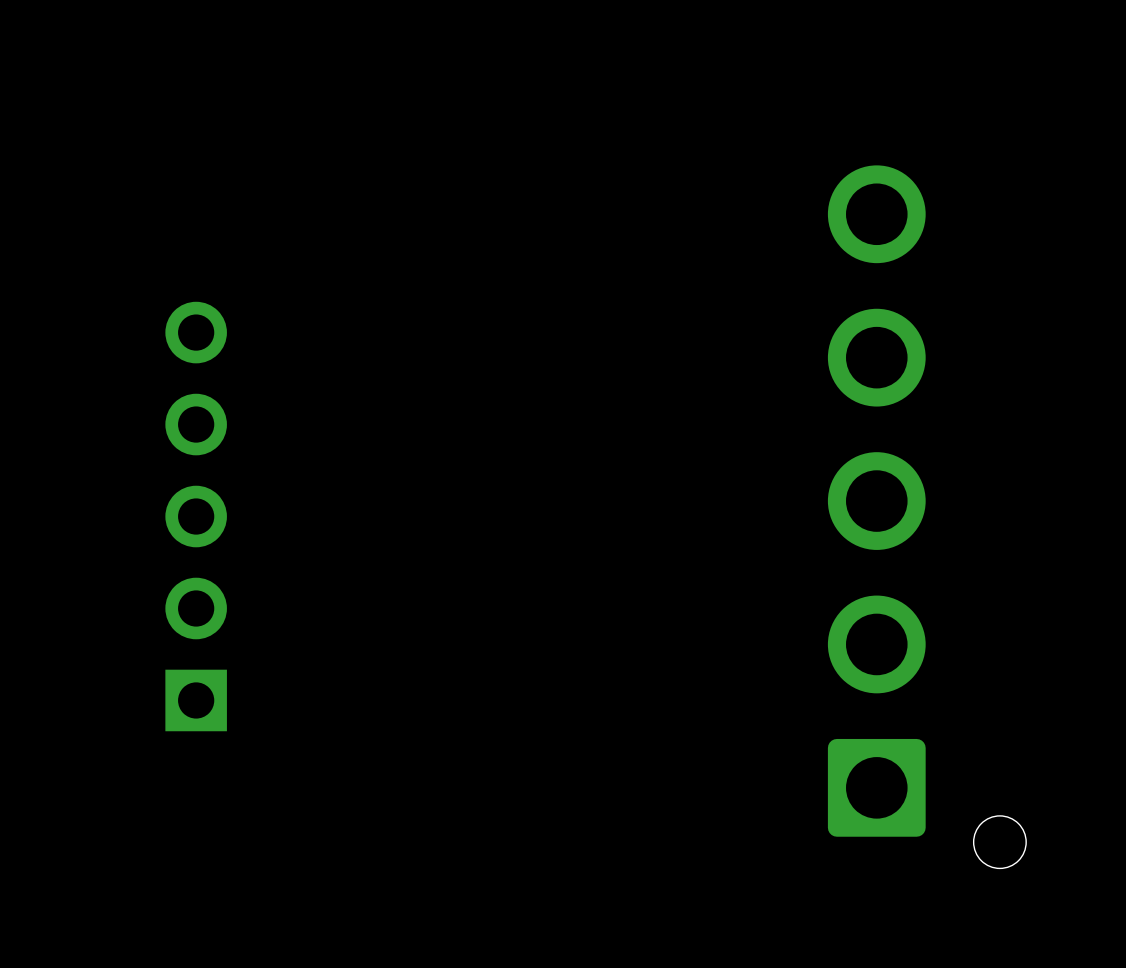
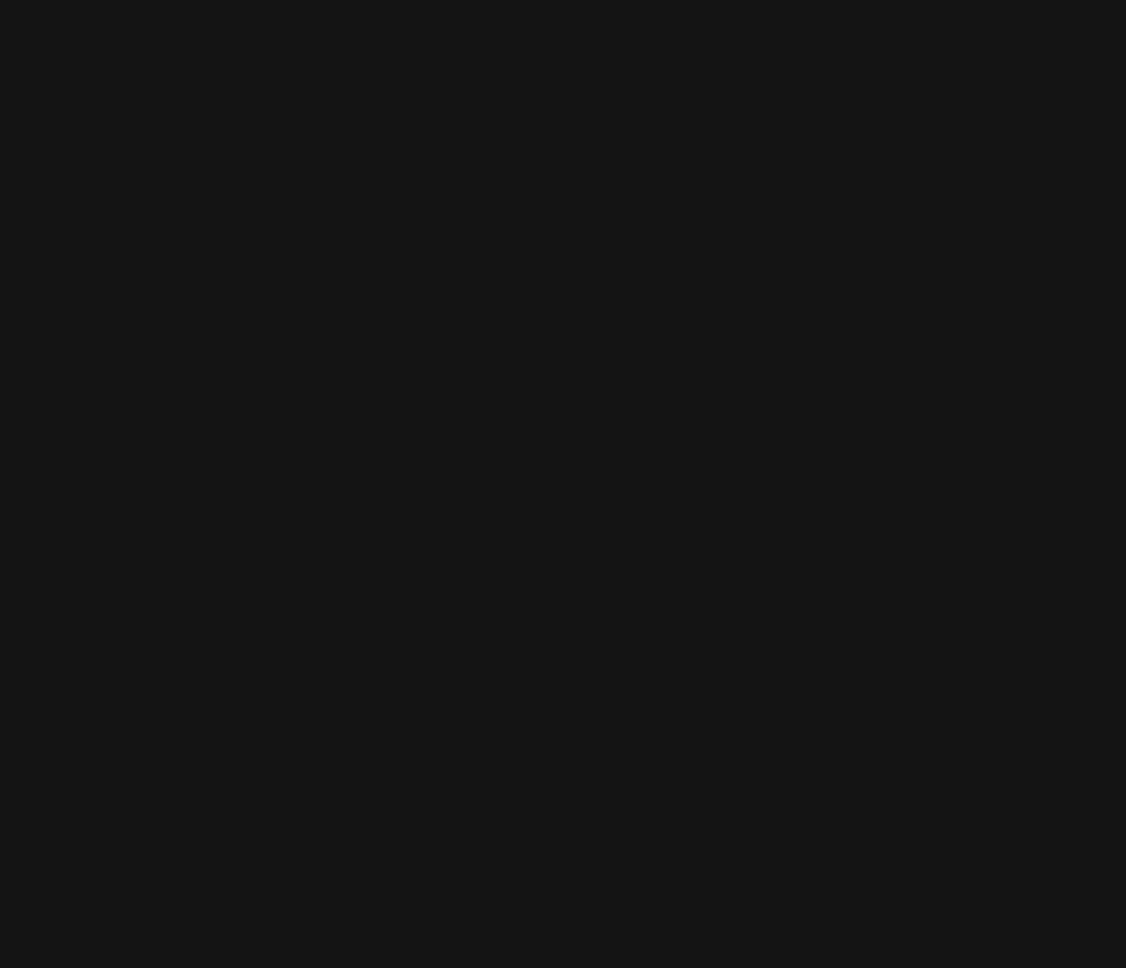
part: (196, 516) -> none
part: (927, 516) -> none

